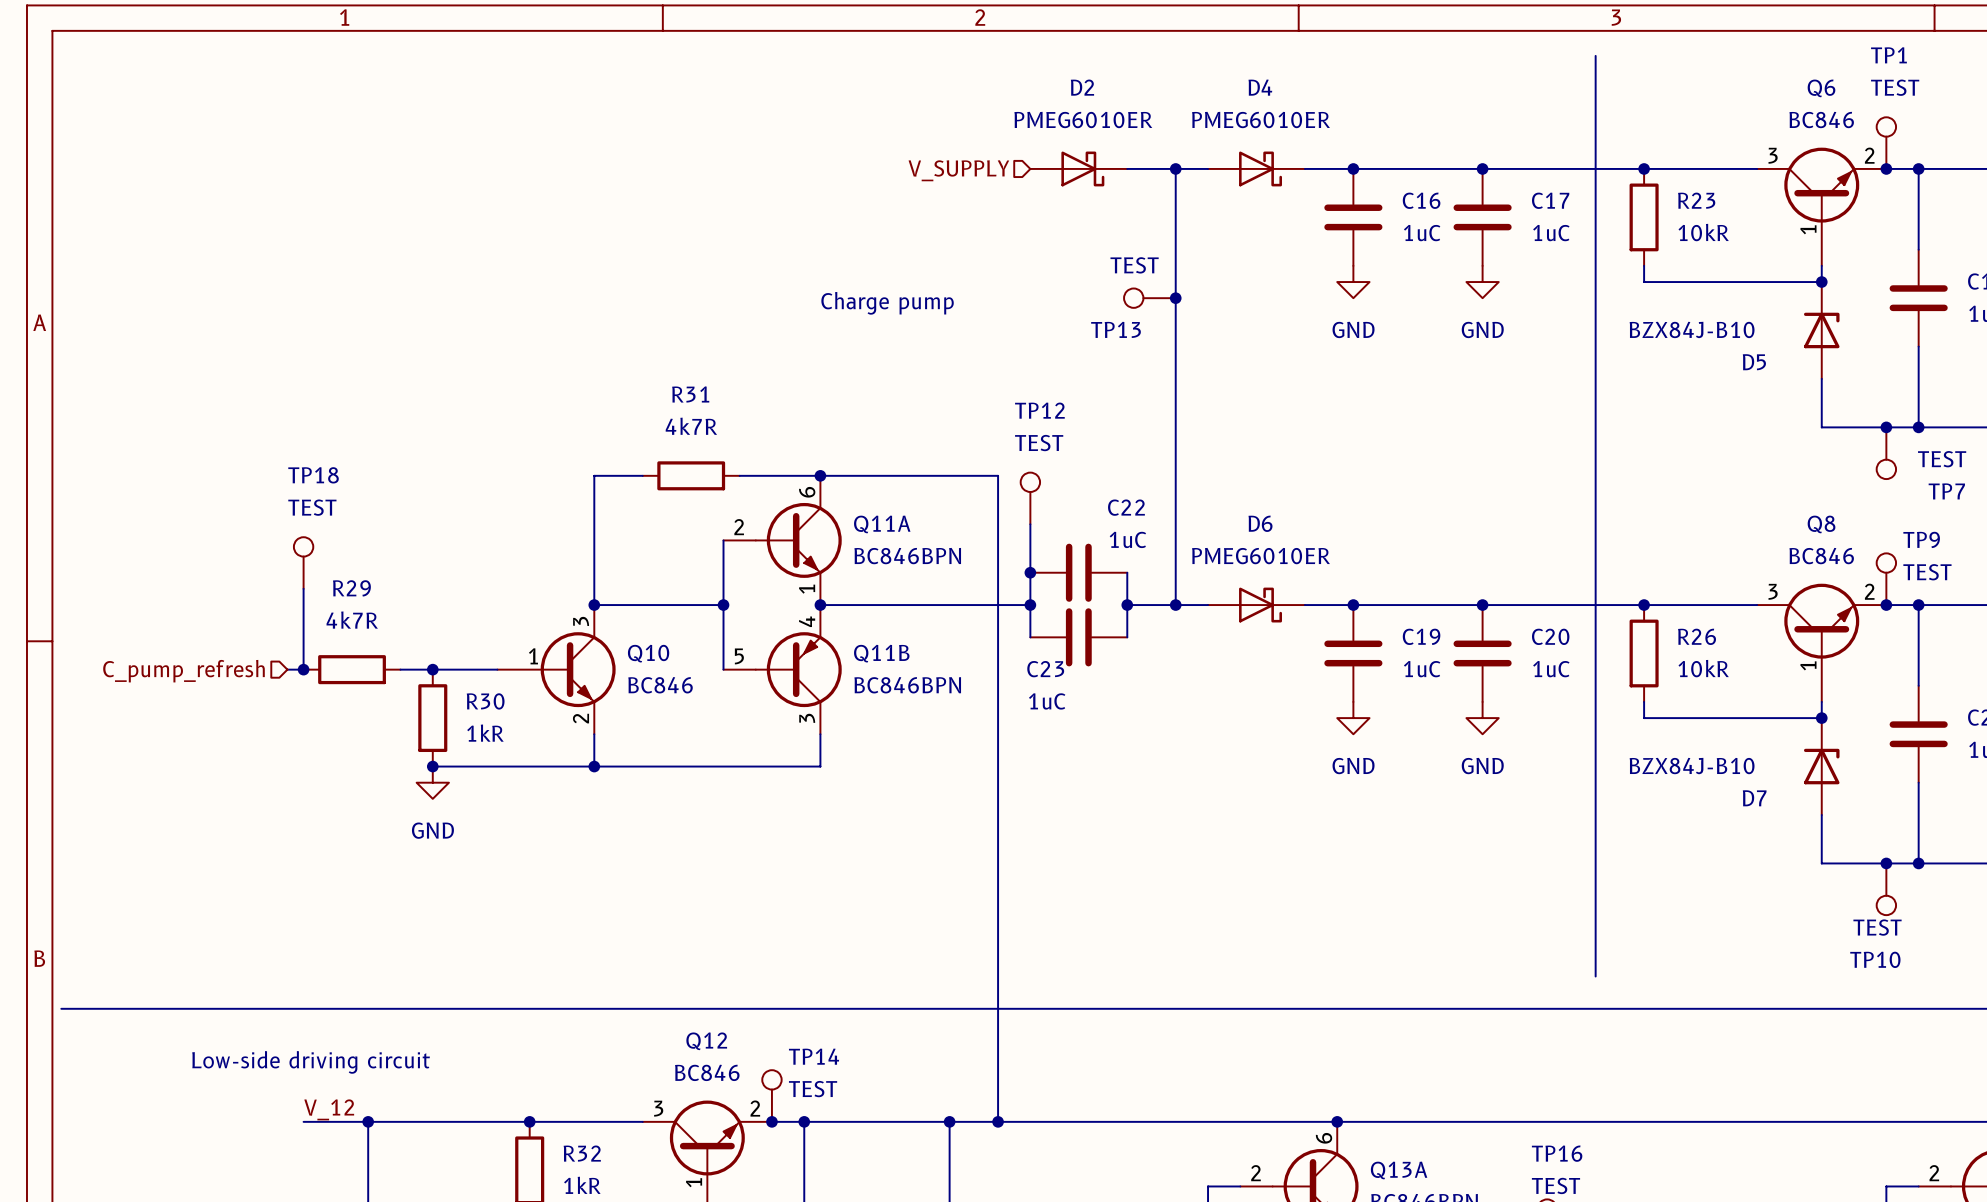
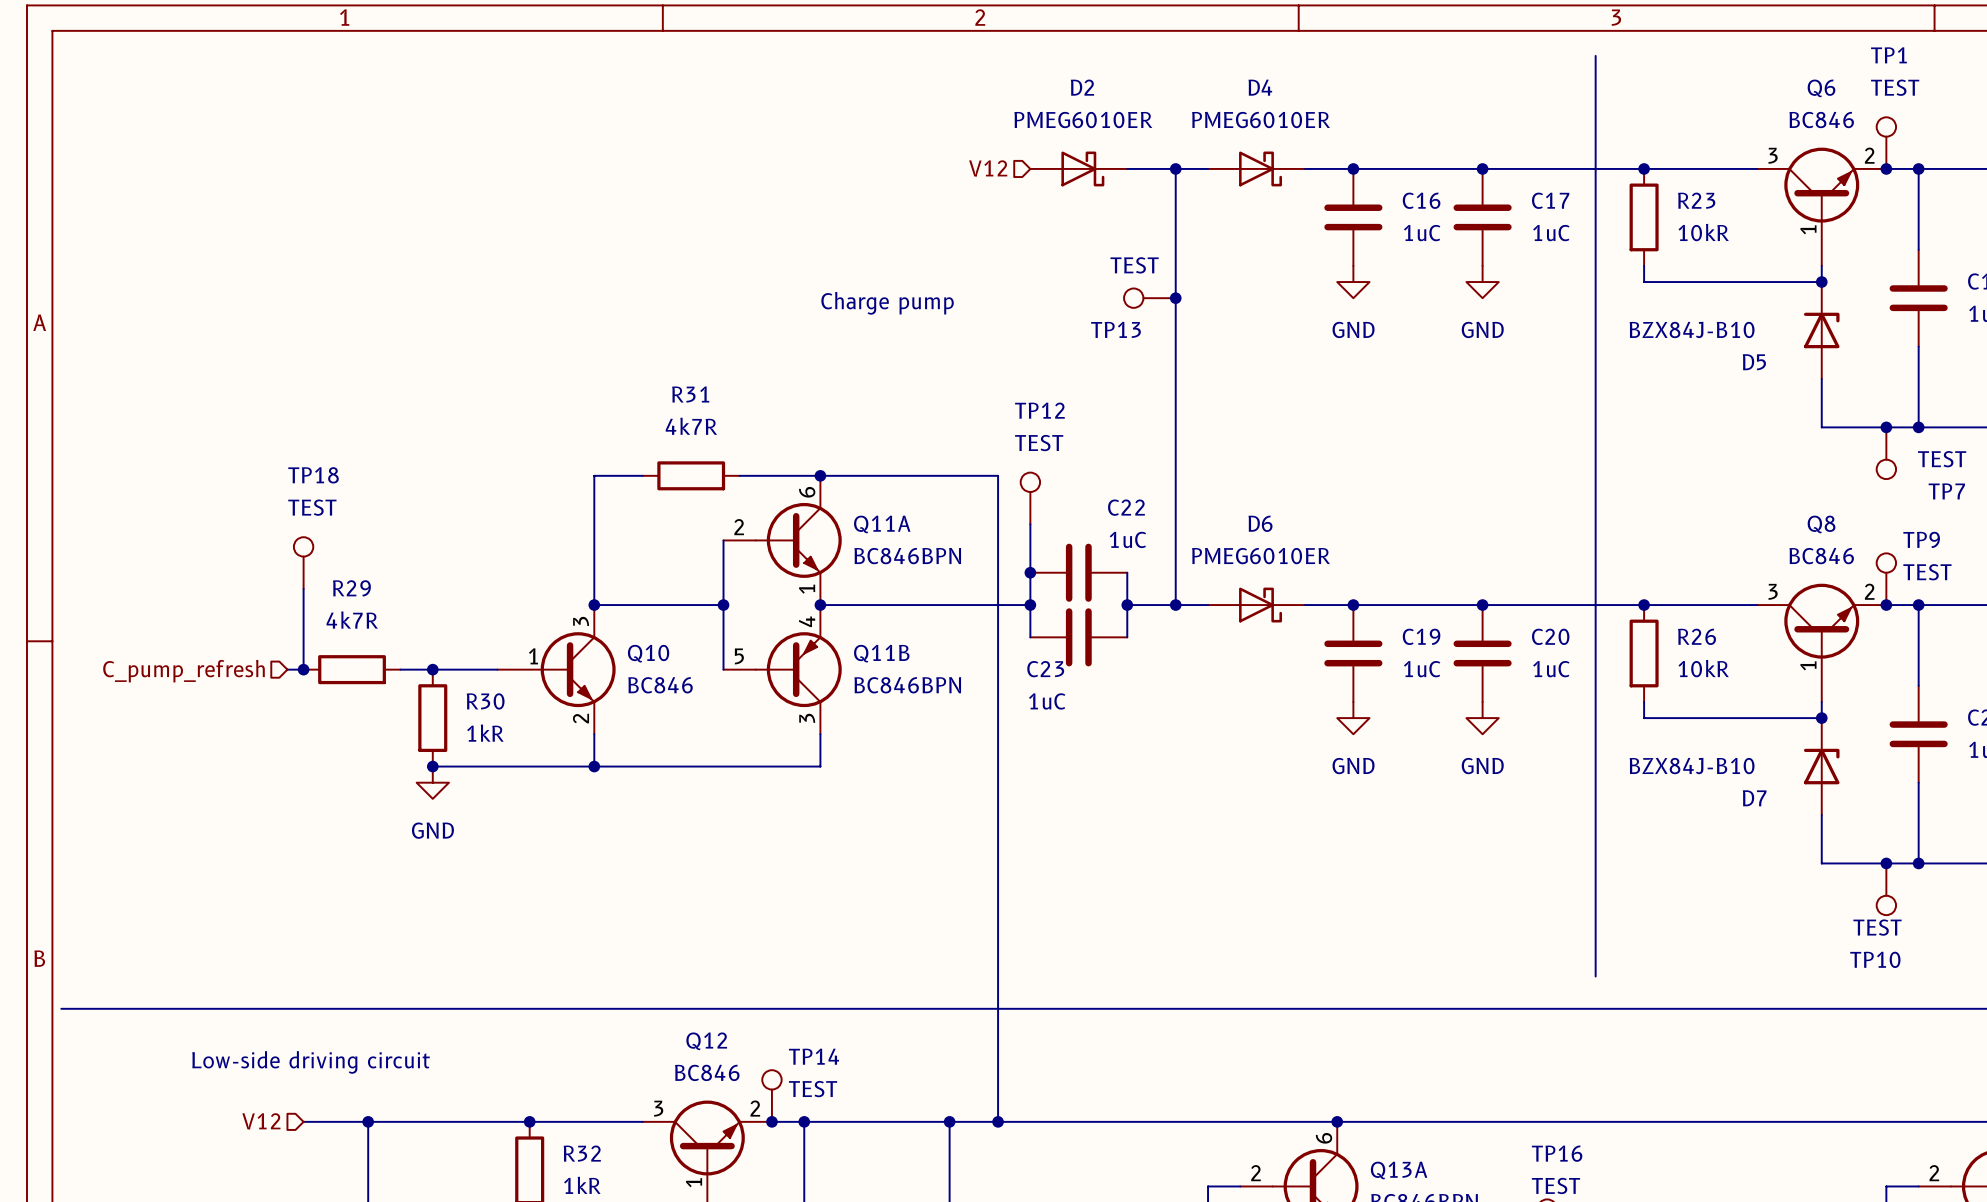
hierarchical label: V_SUPPLY (958, 170) -> V12 (988, 168)
label: V_12 (329, 1109) -> none
hierarchical label: none -> V12 (261, 1121)

